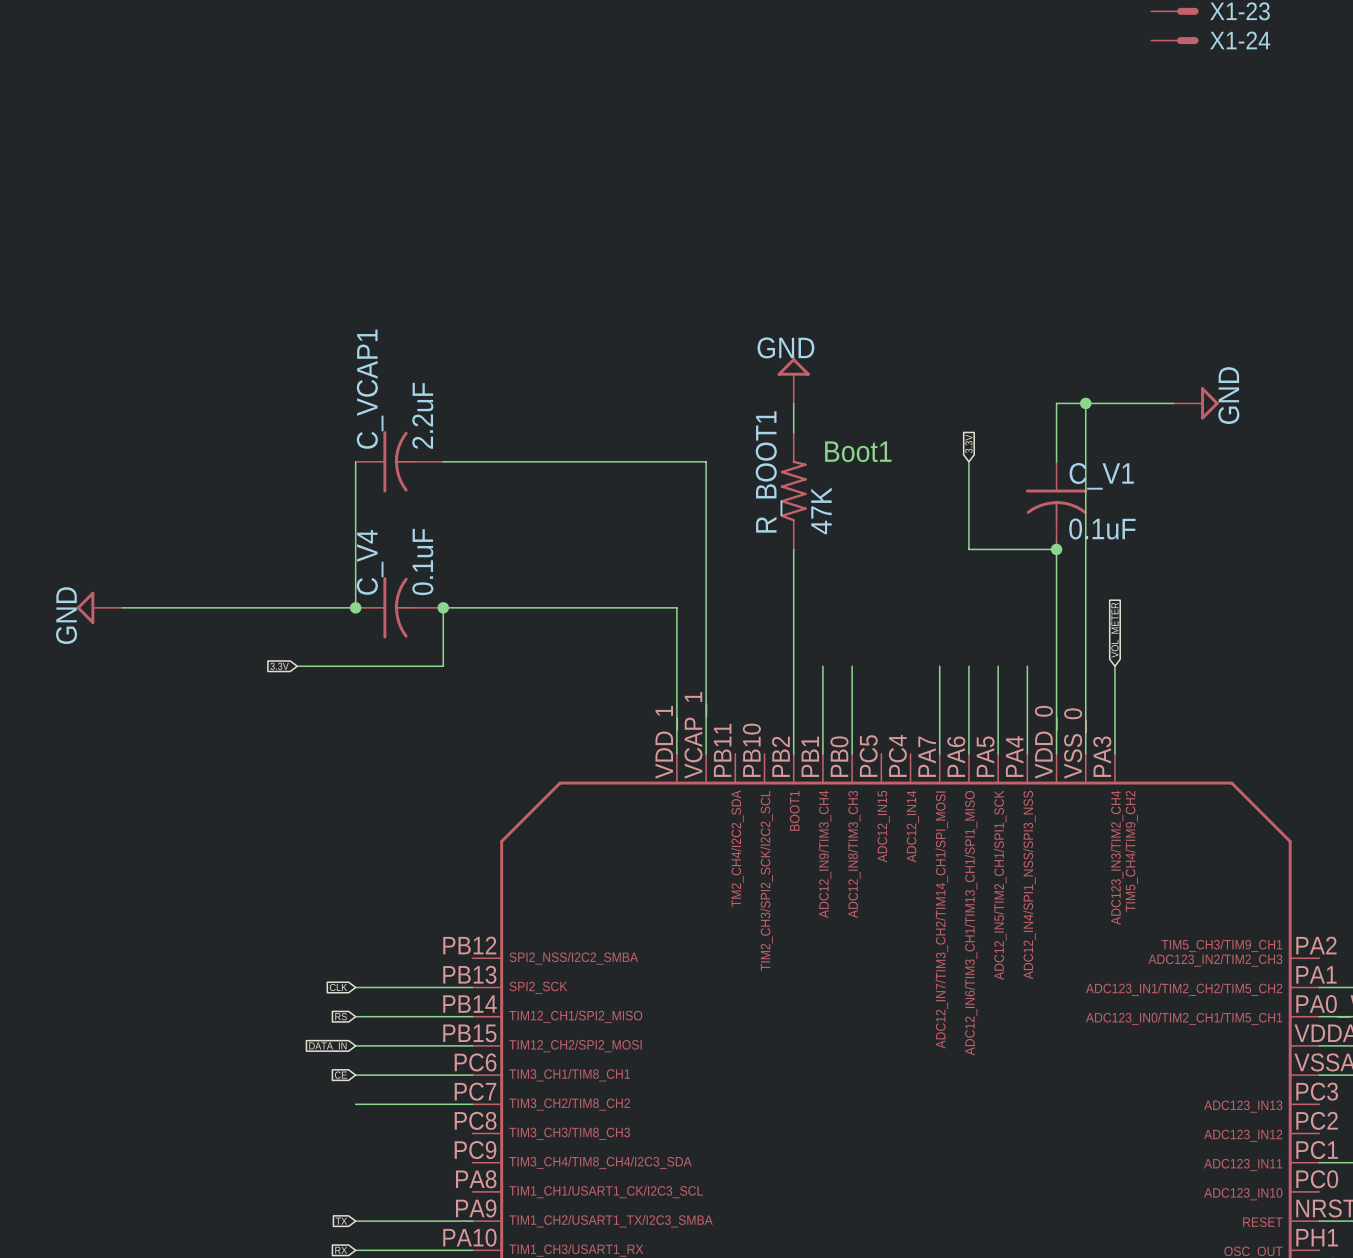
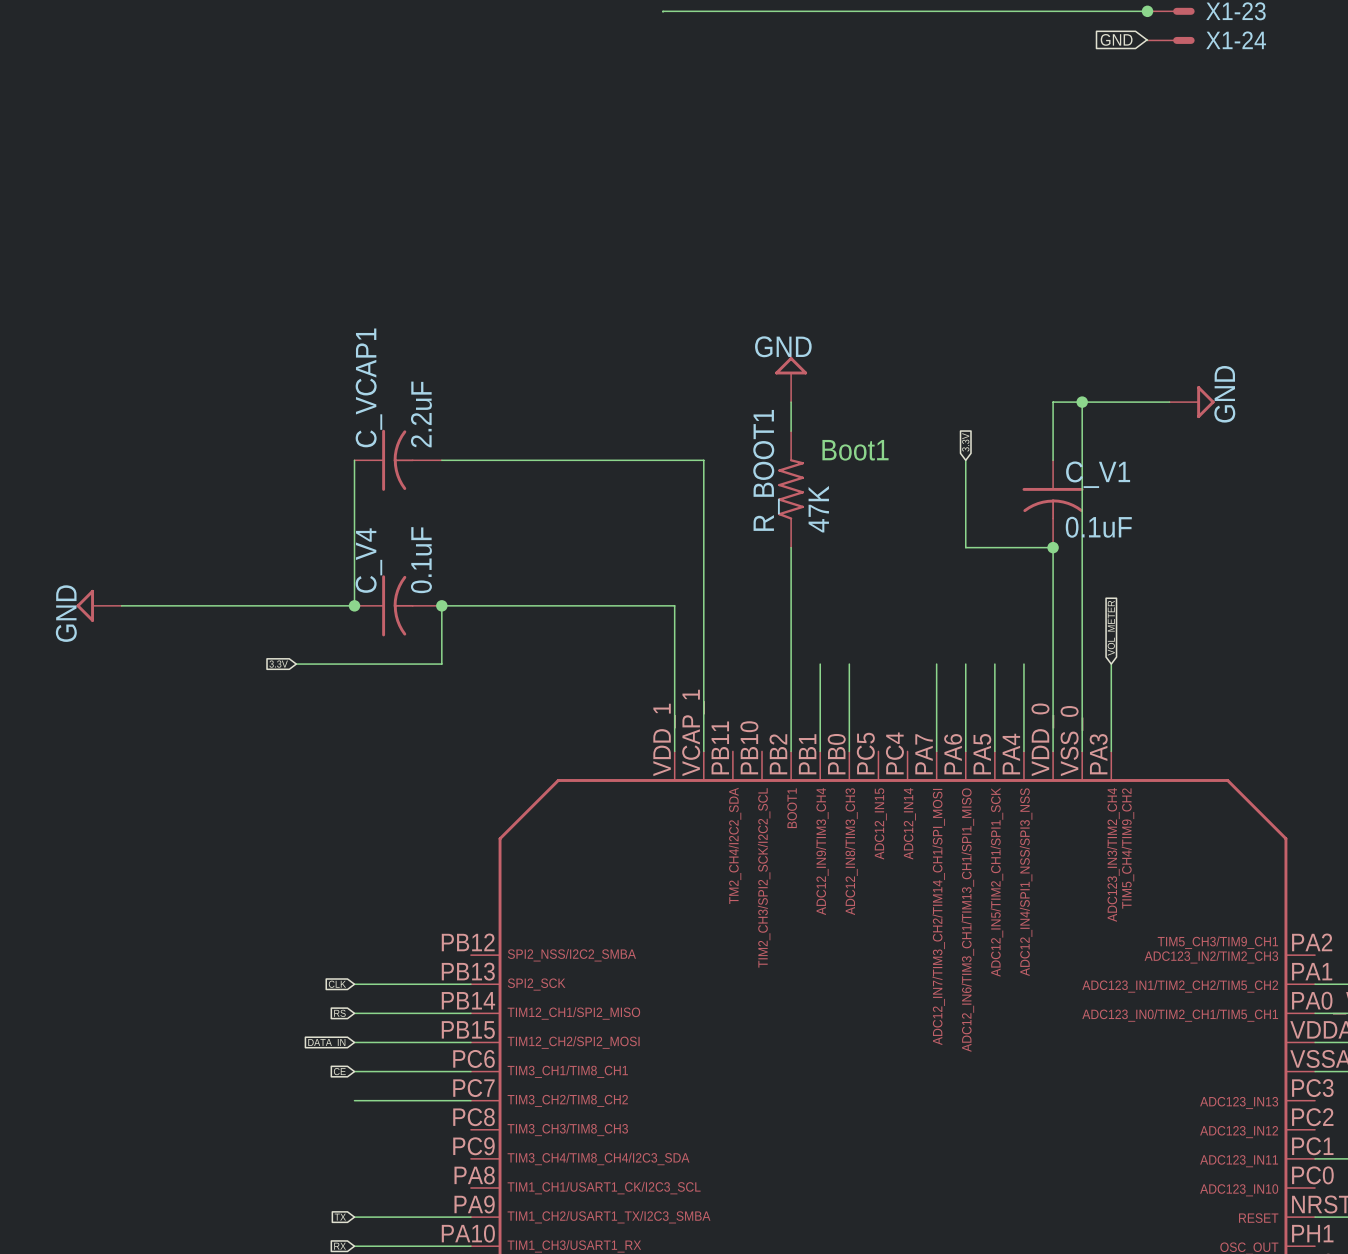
wire: none -> (1146, 11) (662, 12)
junction: none -> (1147, 11)
global label: none -> GND (1116, 39)

